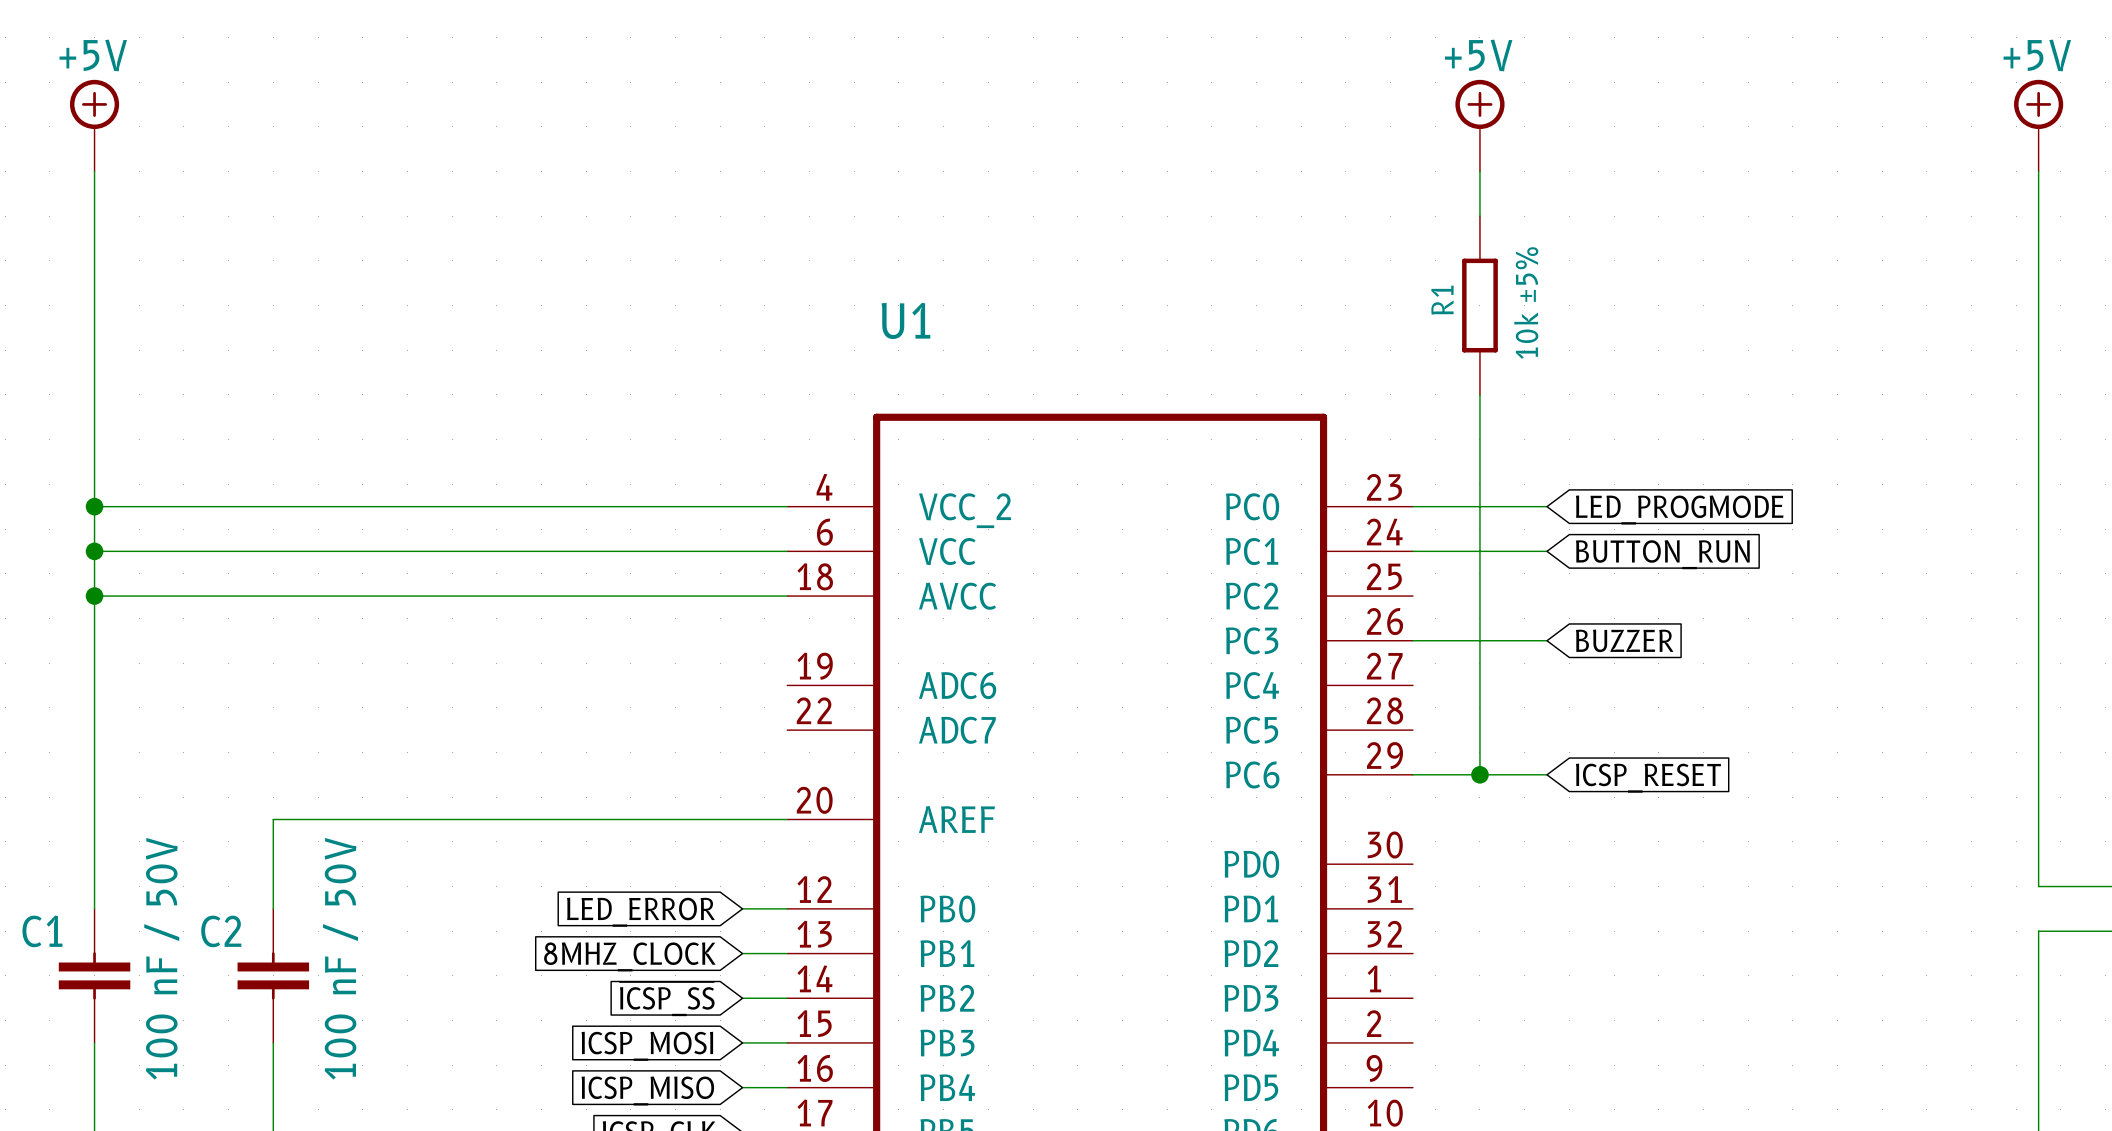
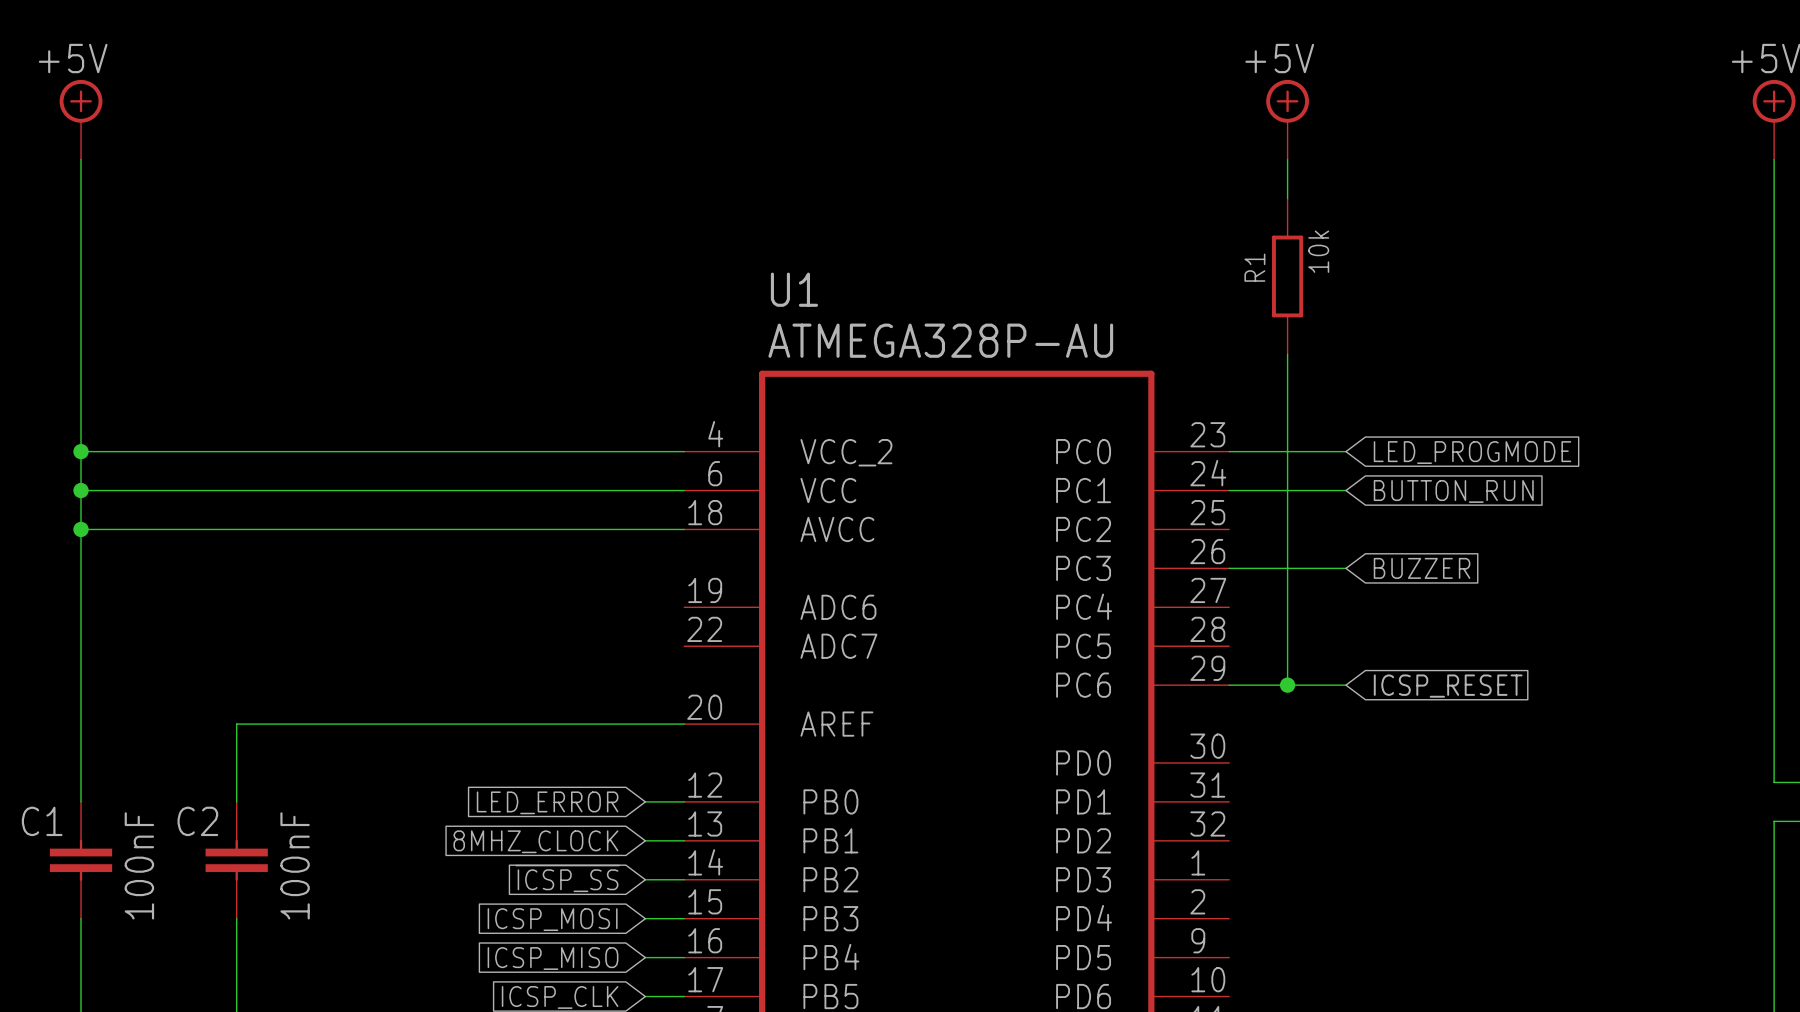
R1 value: 10k ±5% (1526, 303) -> 10k (1318, 251)
U1 value: none -> ATMEGA328P-AU (940, 340)
C1 value: 100 nF / 50V (161, 958) -> 100nF (139, 865)
C2 value: 100 nF / 50V (340, 958) -> 100nF (295, 865)

